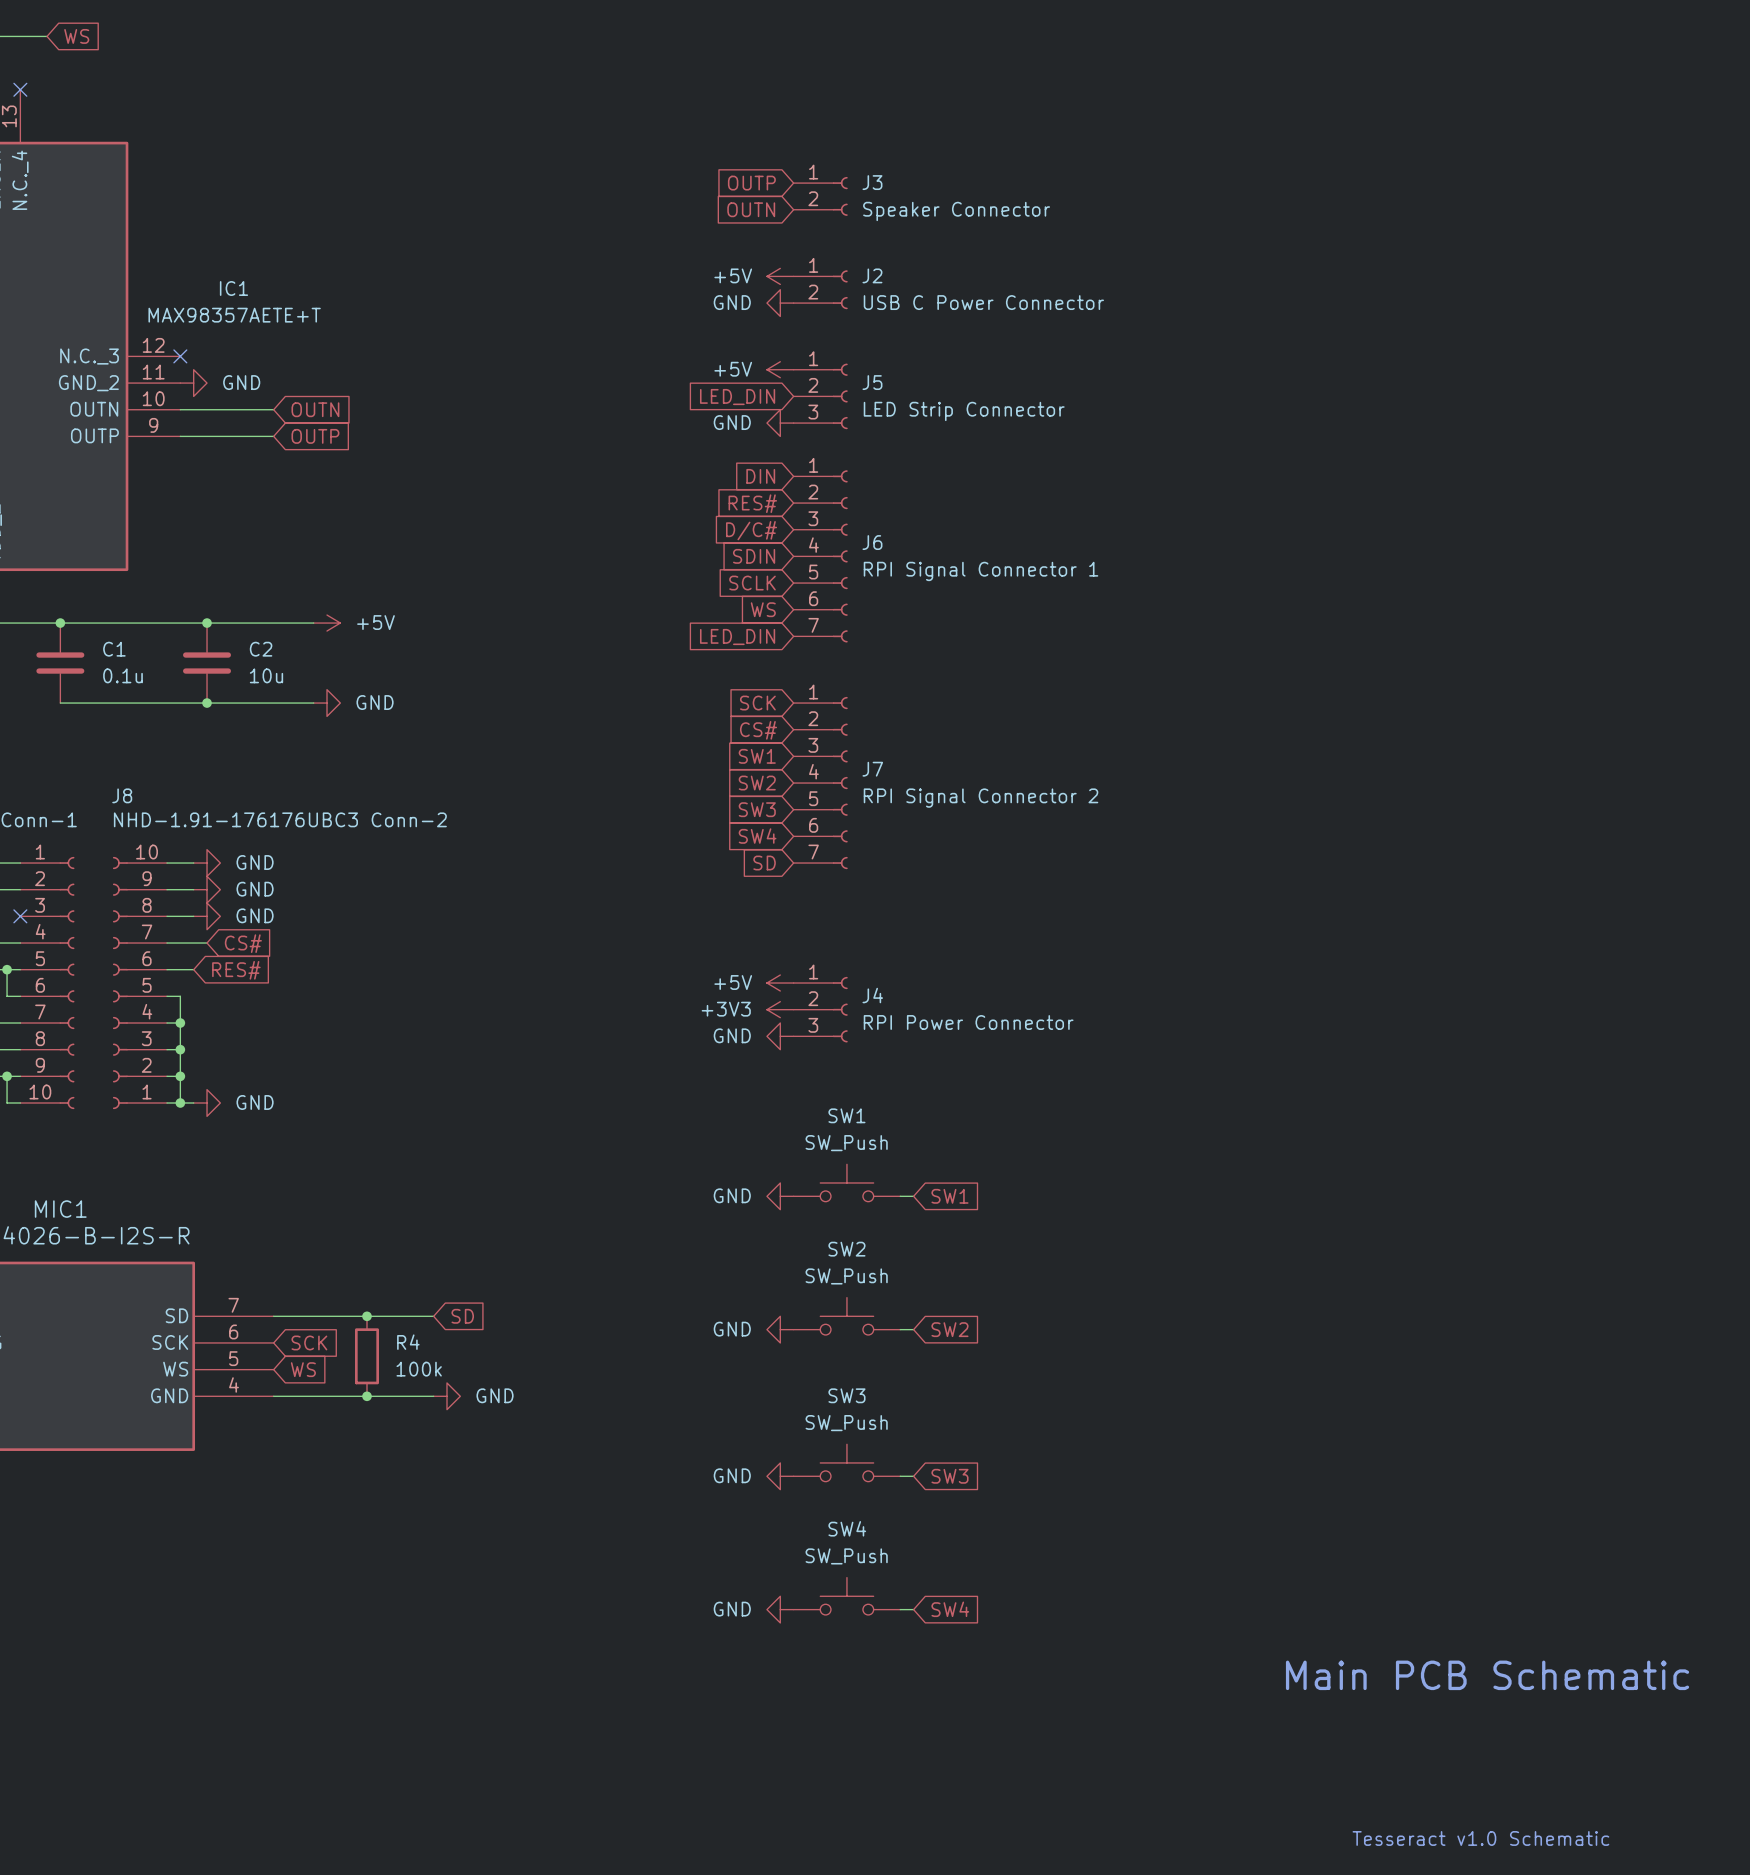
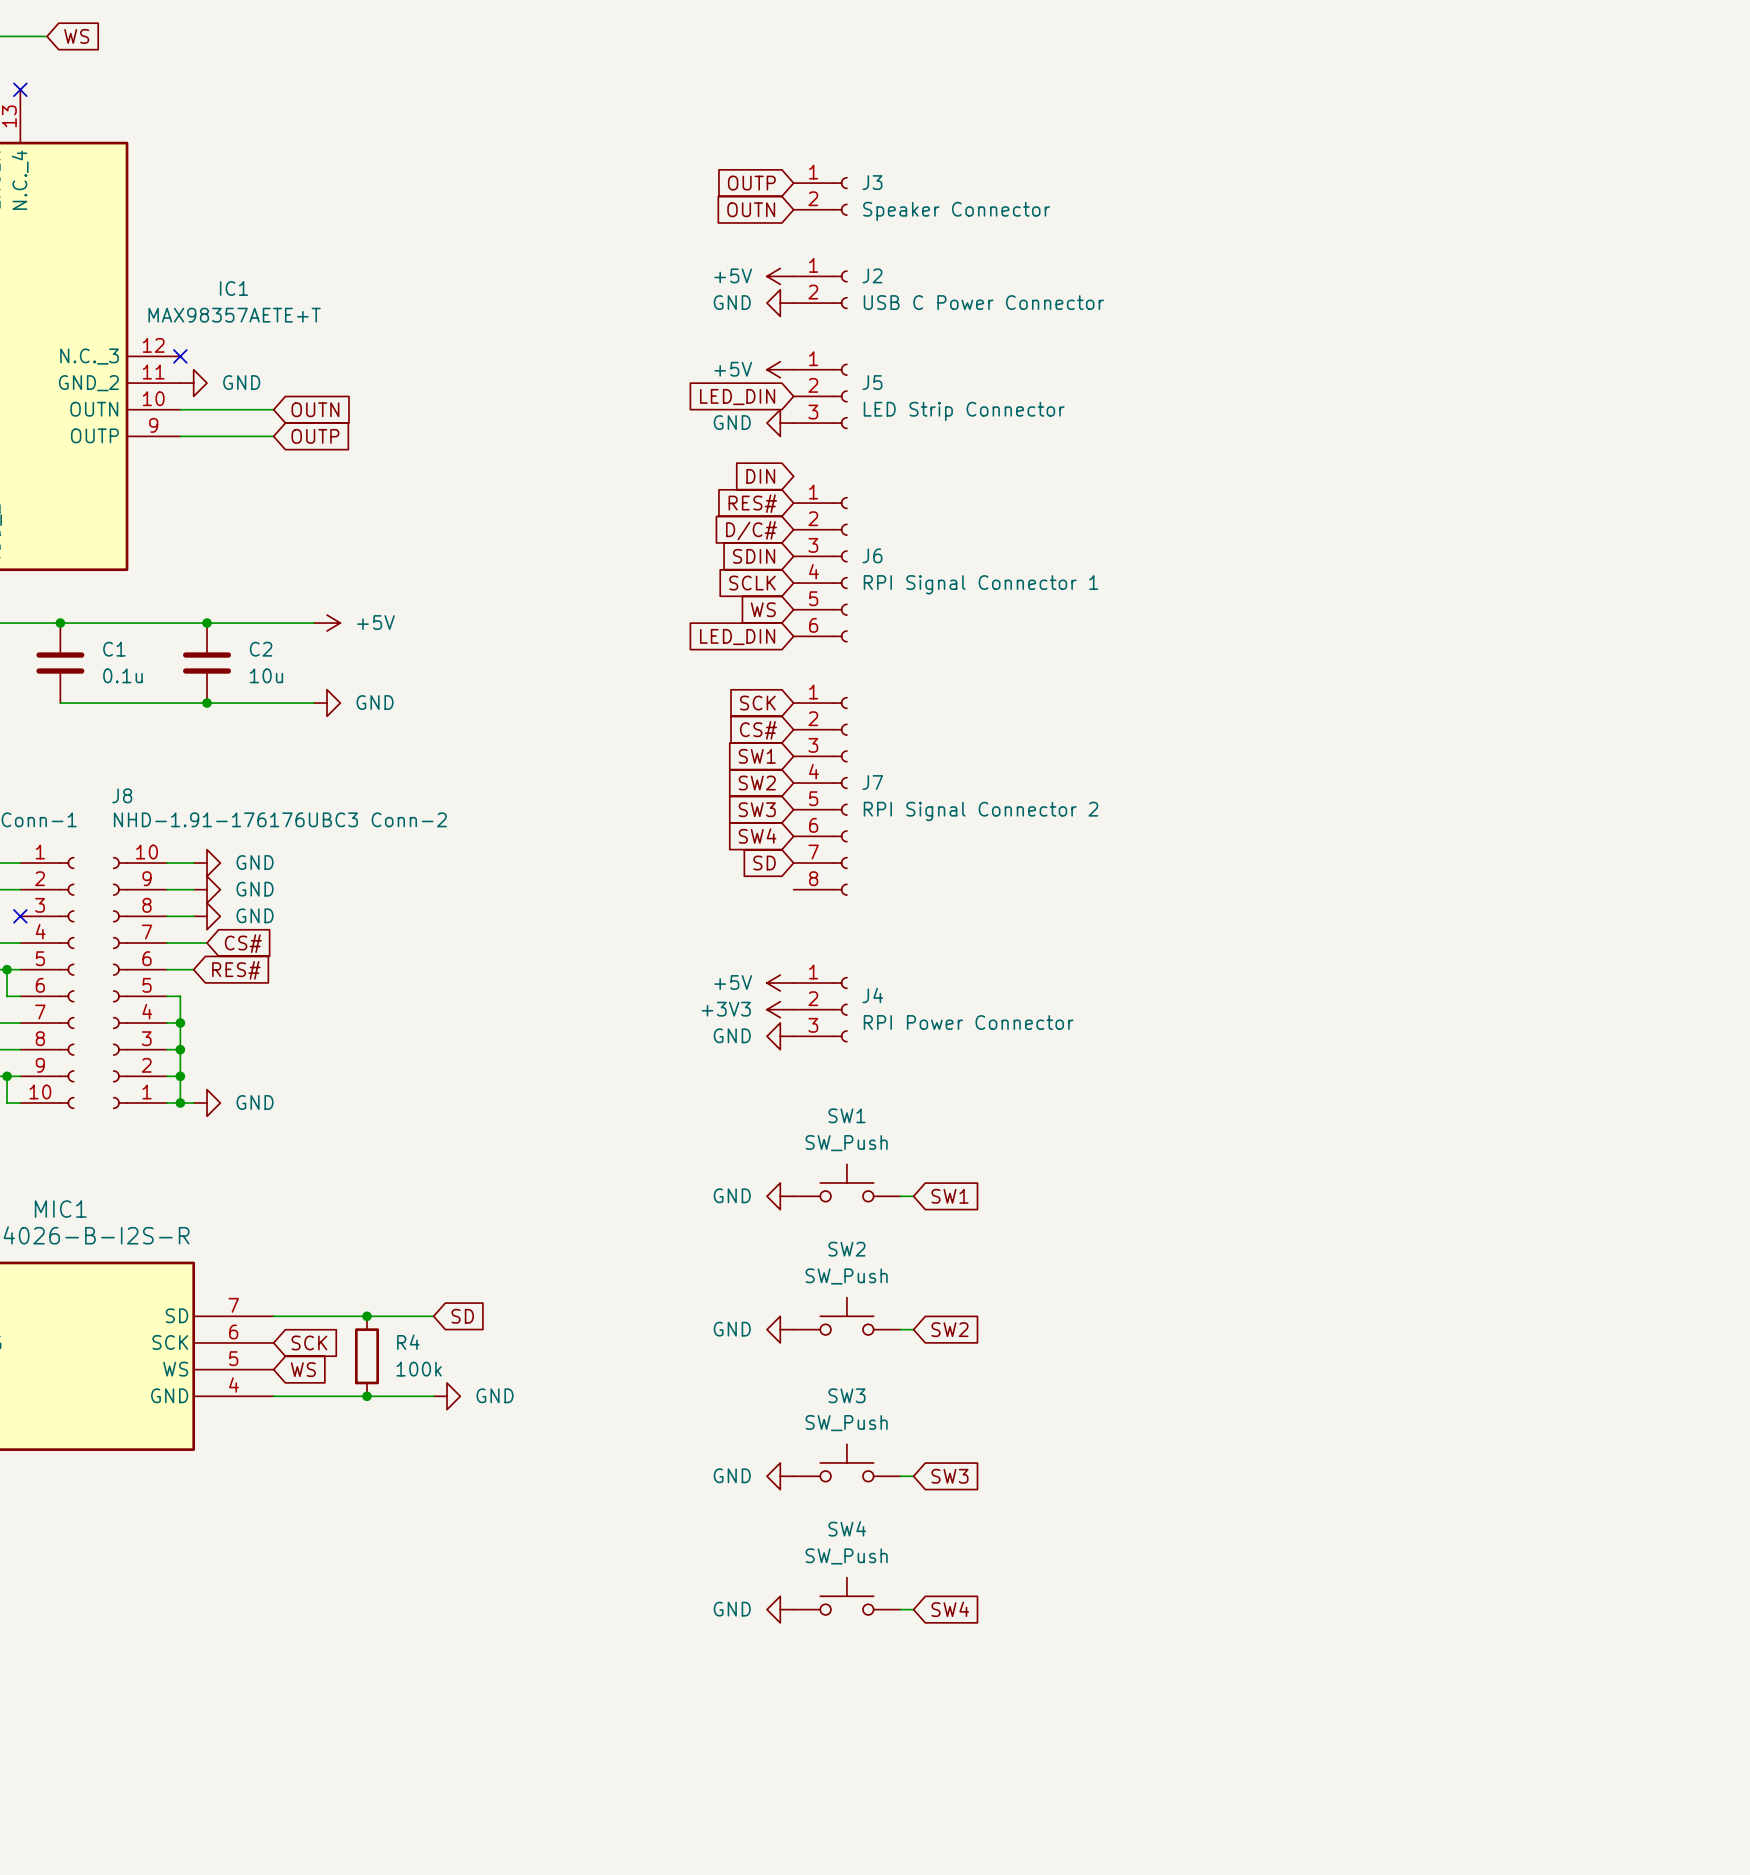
J6 symbol: [793, 470, 848, 643] -> [793, 496, 848, 643]
J7 symbol: [793, 696, 848, 870] -> [793, 696, 848, 896]
text: Main PCB Schematic (1487, 1675) -> none
text: Tesseract v1.0 Schematic (1480, 1838) -> none

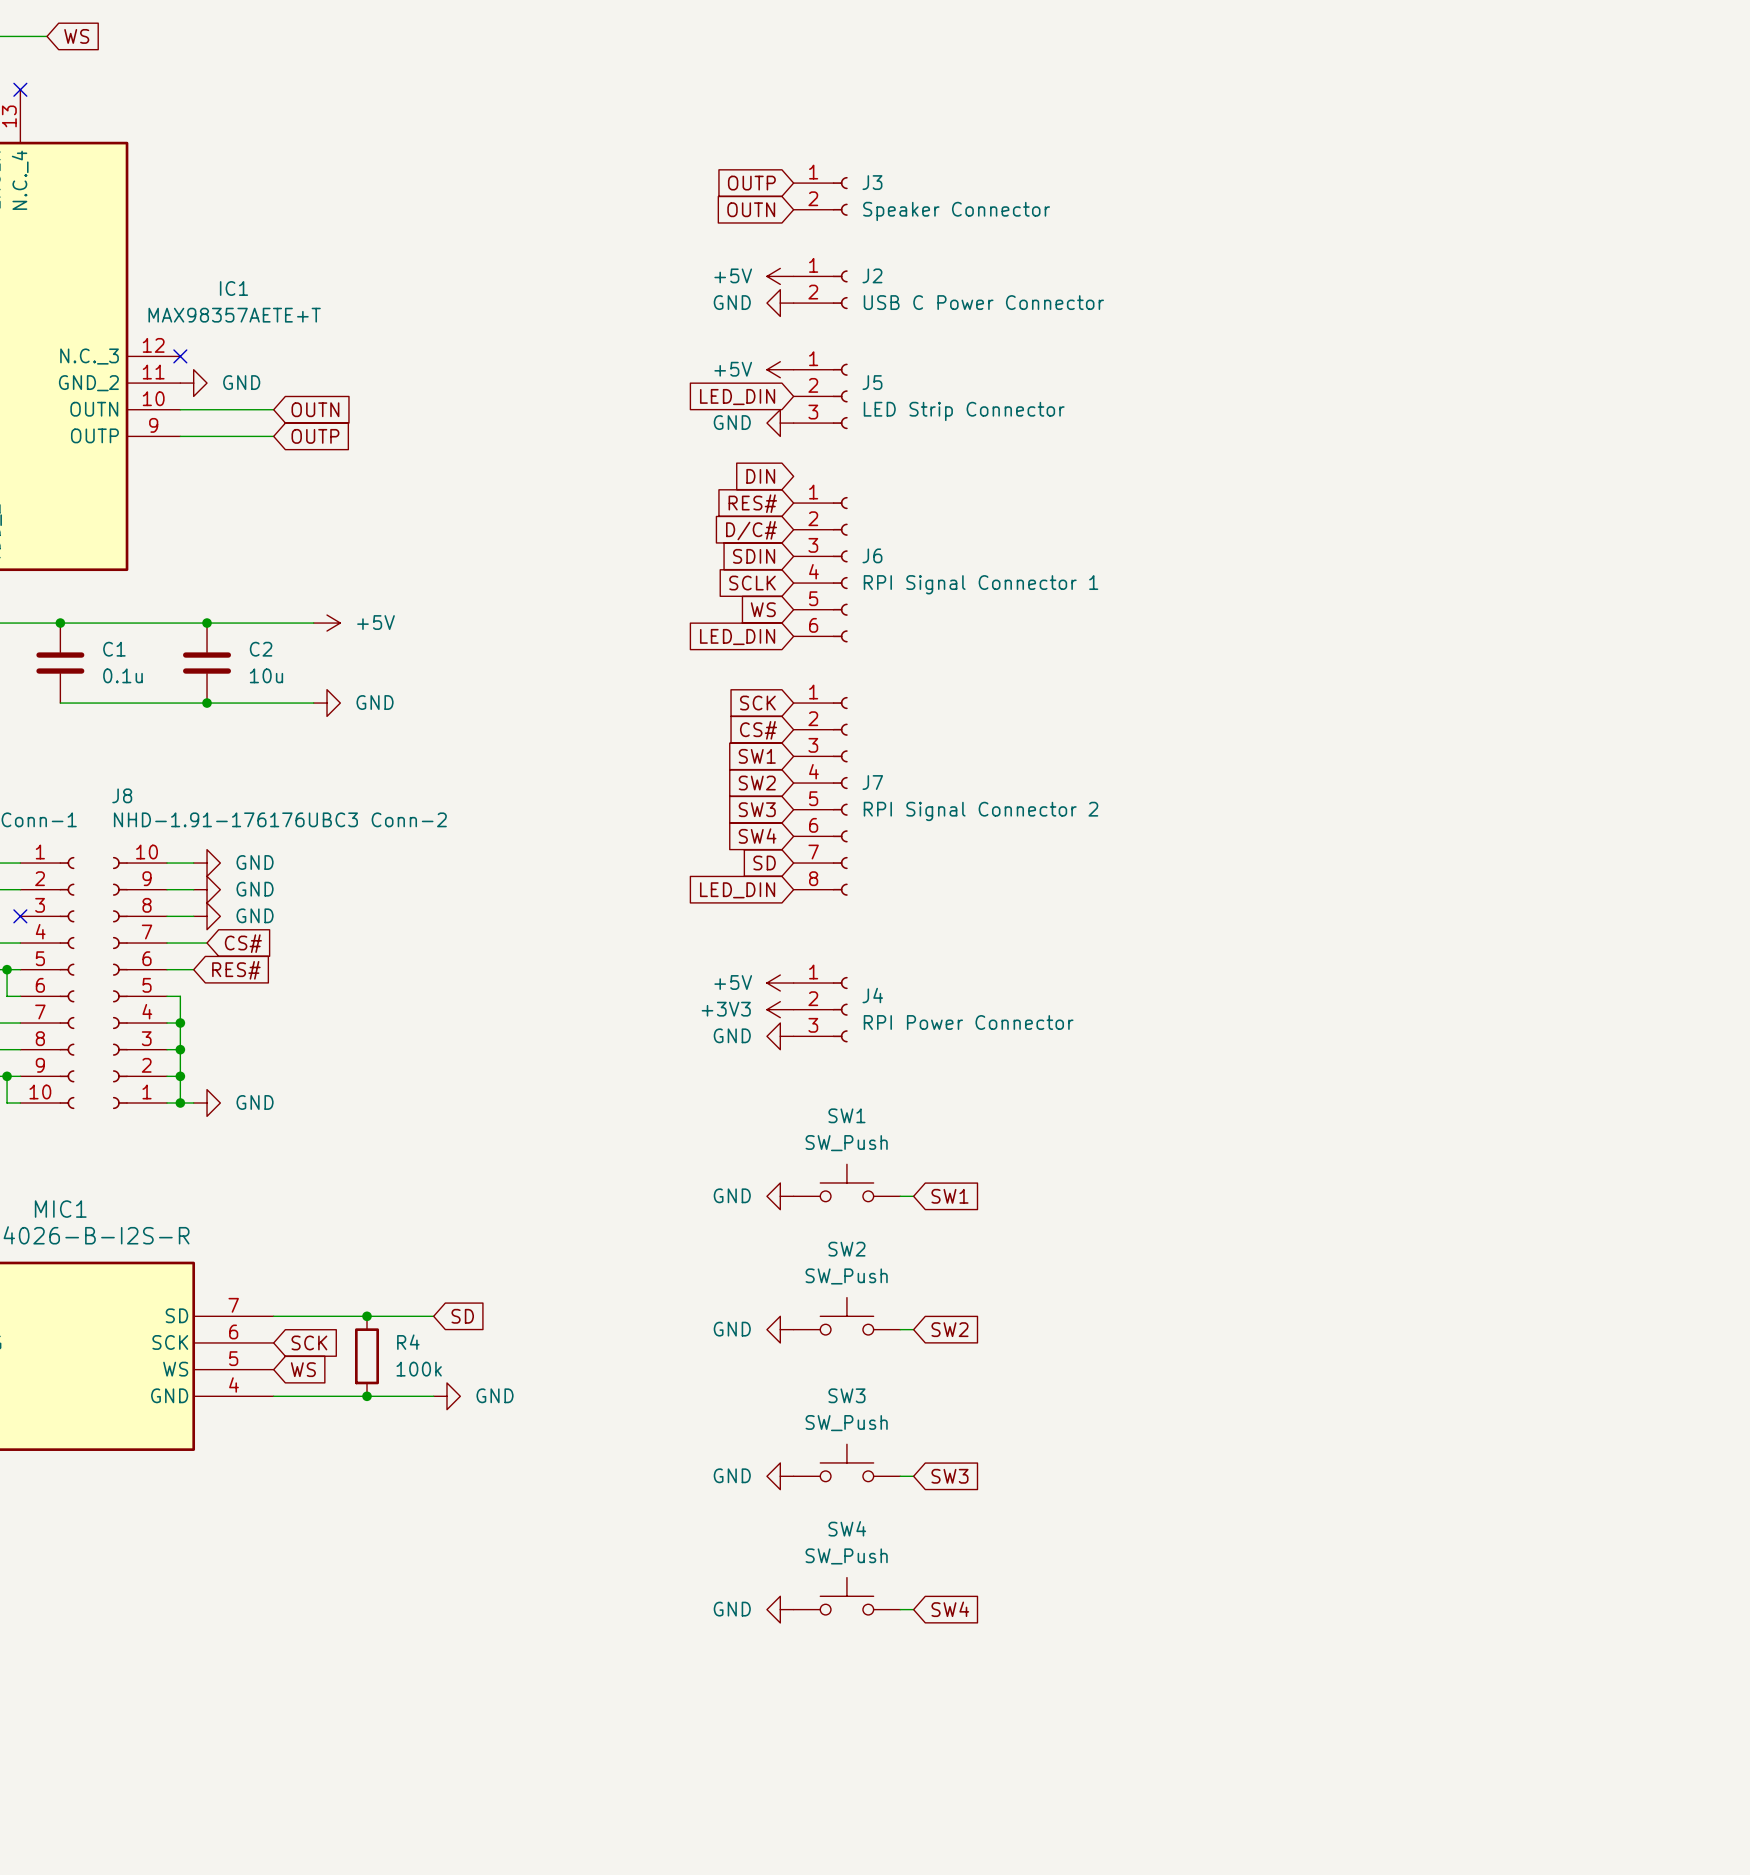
global label: none -> LED_DIN (737, 890)

